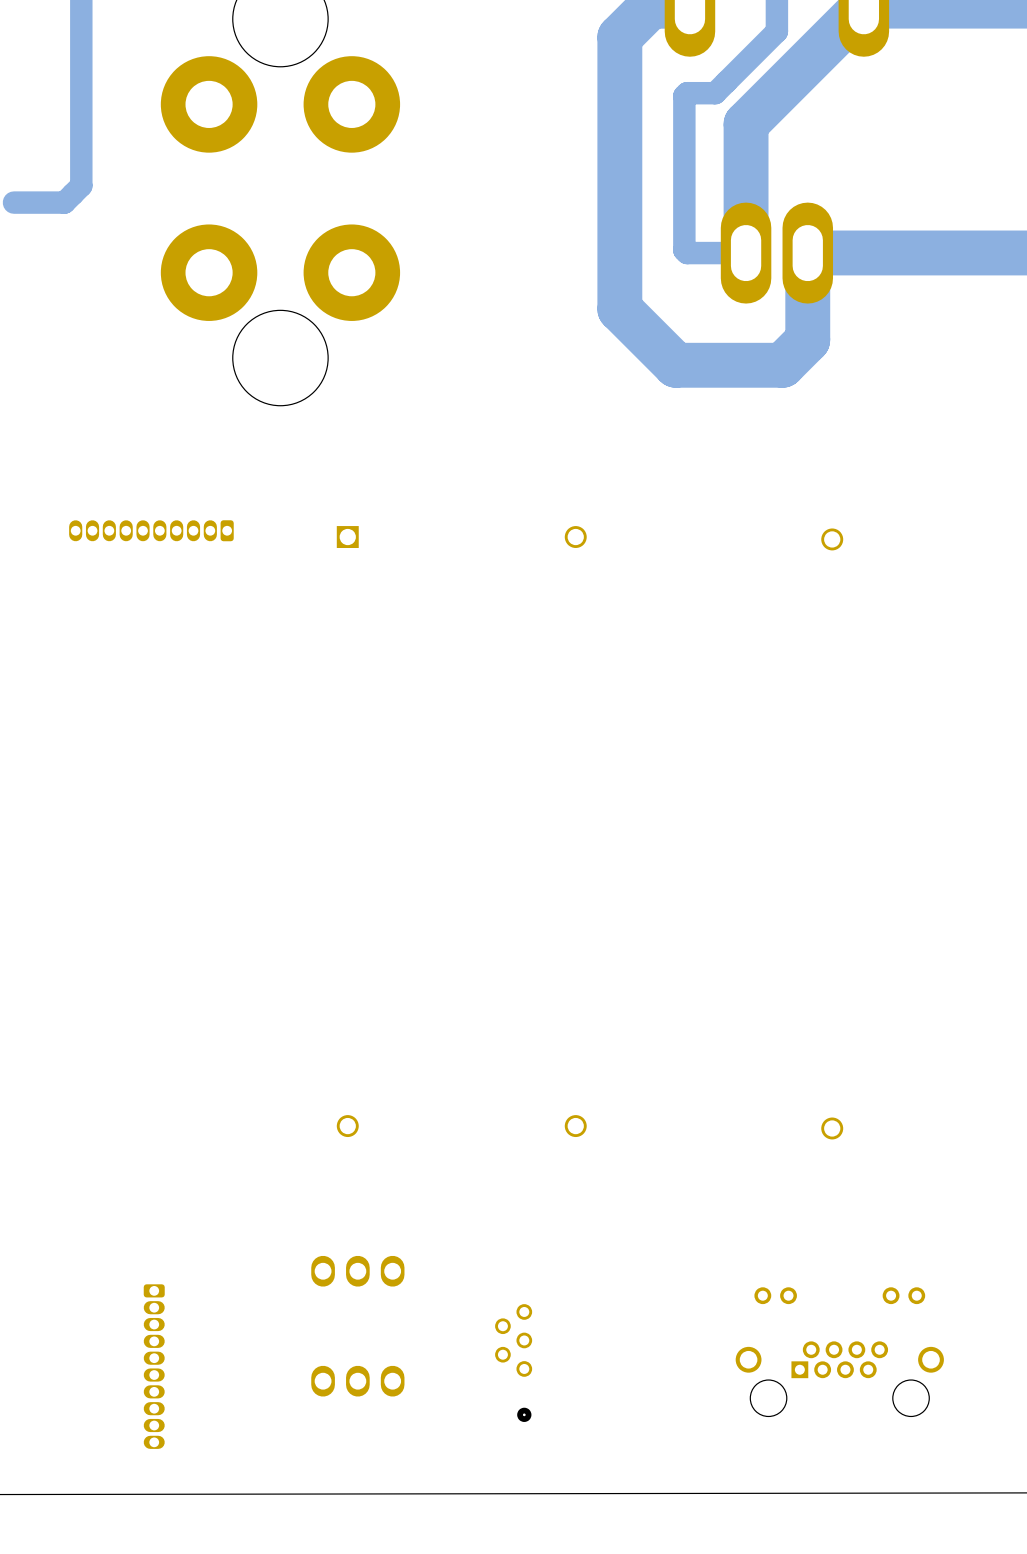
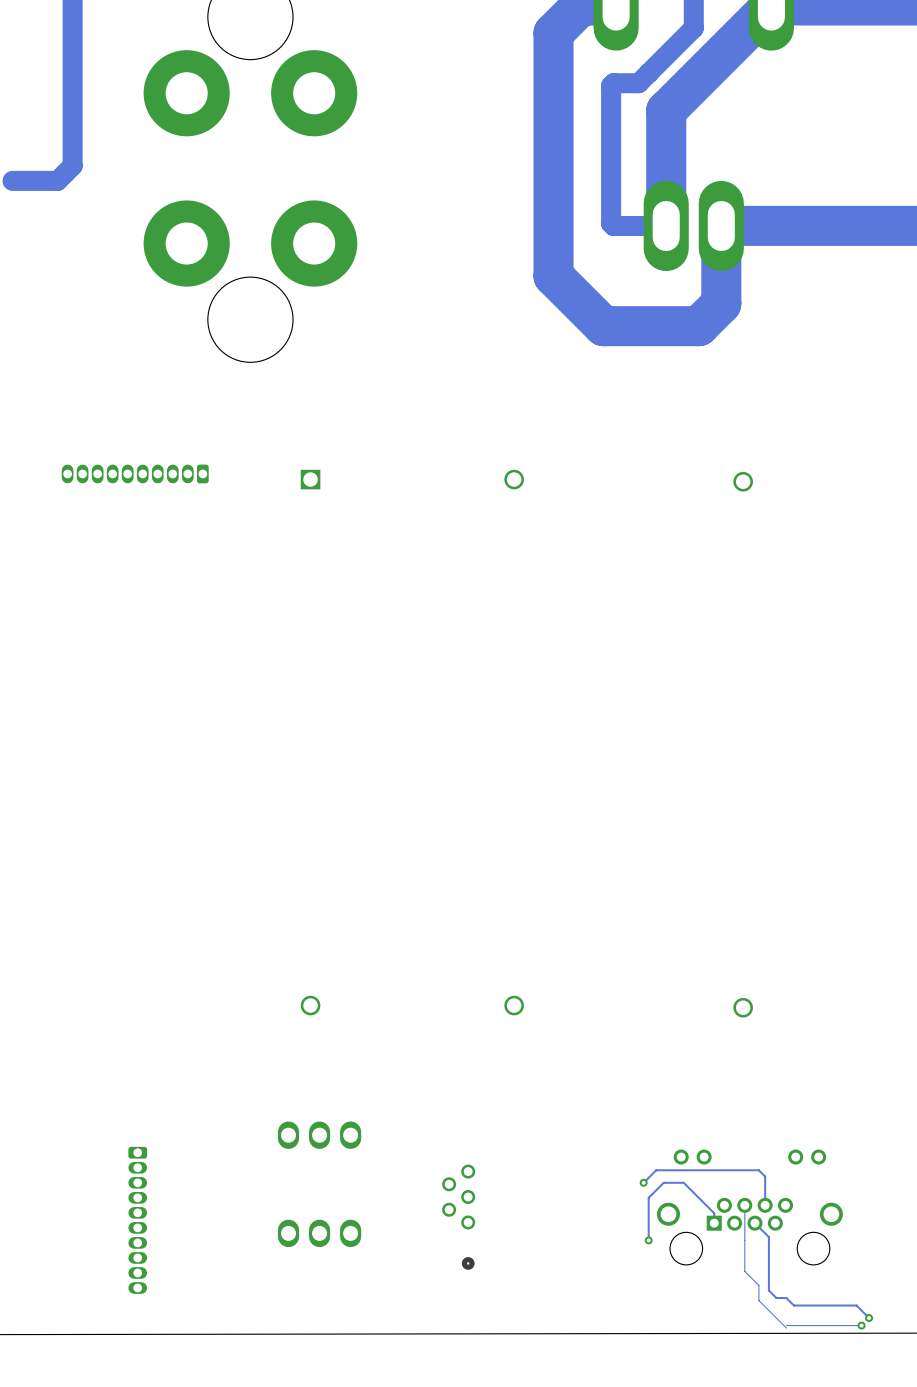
track: none -> (643, 1182) (656, 1170) (758, 1170) (765, 1176) (765, 1205)
via: none -> (643, 1182)
track: none -> (744, 1205) (744, 1271) (758, 1285) (758, 1300) (786, 1328)
track: none -> (714, 1223) (714, 1213) (683, 1182) (663, 1182) (648, 1197) (648, 1240)
track: none -> (754, 1223) (768, 1237) (768, 1290) (776, 1298) (786, 1298) (793, 1305) (856, 1305) (869, 1318)
via: none -> (648, 1240)
via: none -> (869, 1318)
via: none -> (861, 1325)
track: none -> (862, 1325) (786, 1325)

